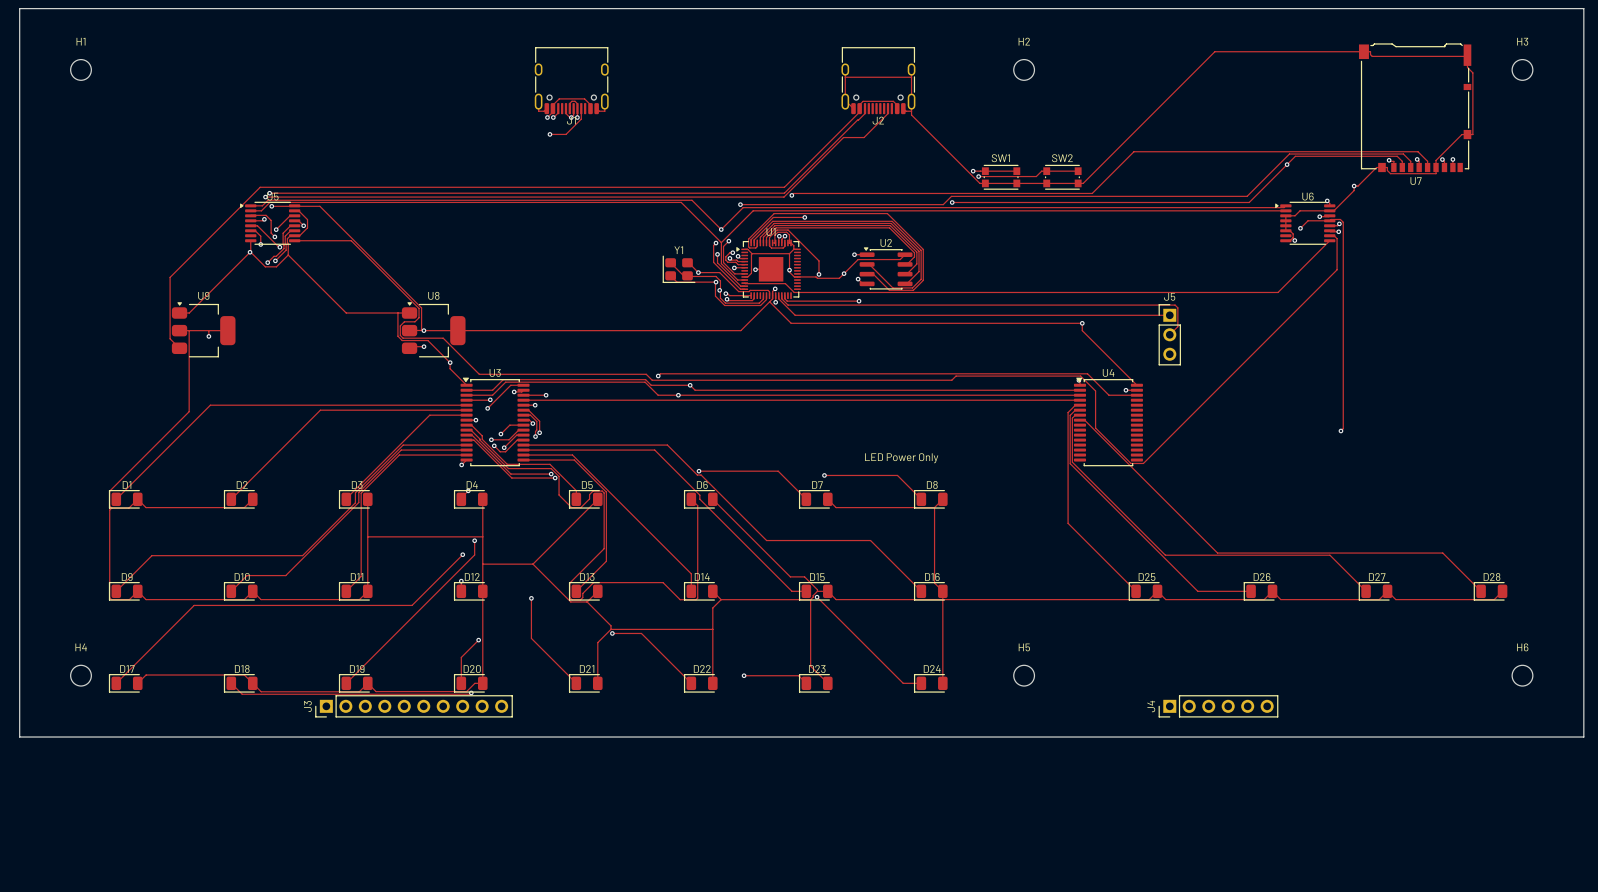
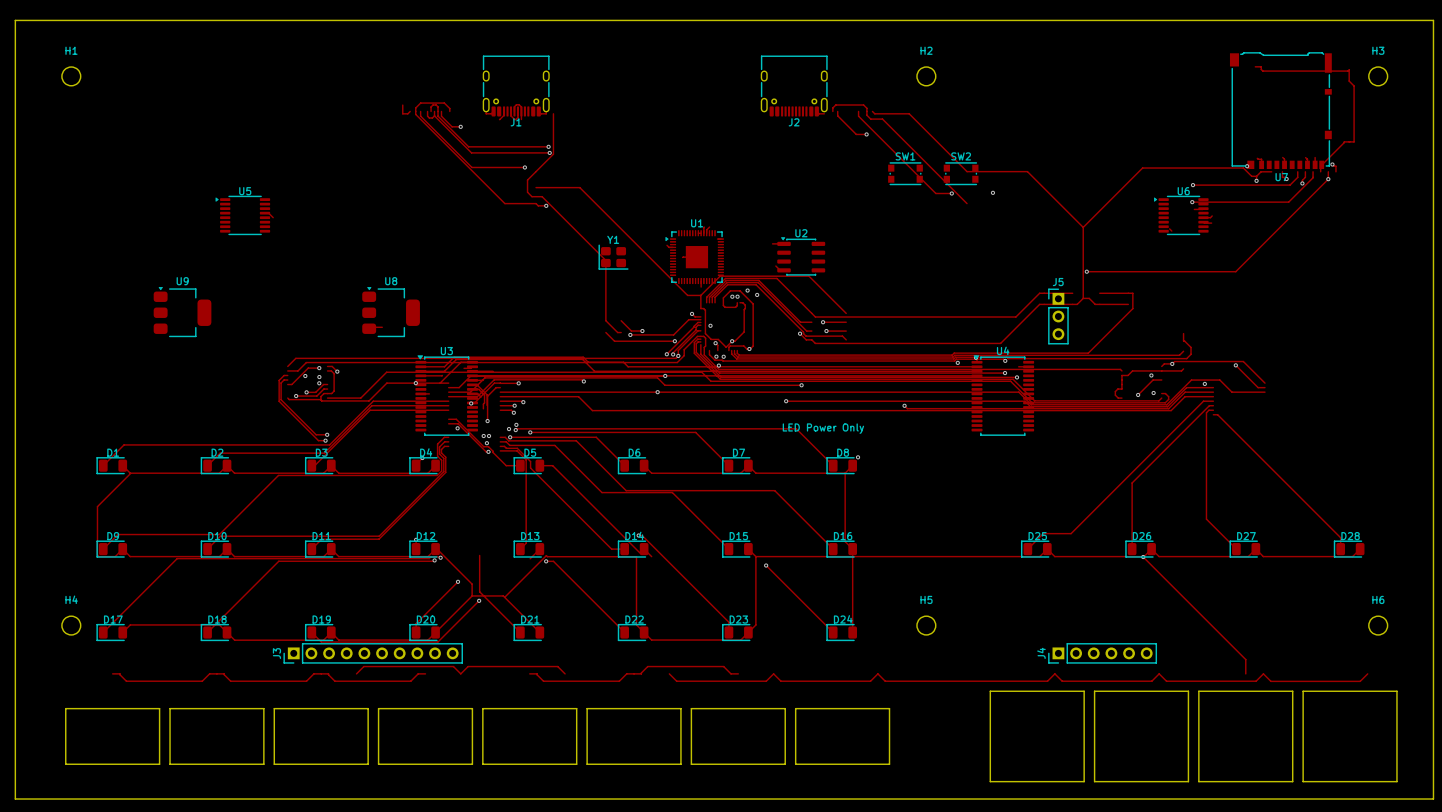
board edge: (19, 8) (1583, 8) (1583, 737) (19, 737) (19, 8) -> (15, 20) (15, 799) (1433, 799) (1433, 20) (15, 20)
track: none -> (1255, 66) (1261, 66) (1262, 71) (1349, 69) (1349, 81) (1354, 86) (1354, 141) (1344, 141) (1320, 166) (1320, 171)
track: (845, 69) (845, 104) (849, 104) (853, 108) -> none
track: (911, 69) (911, 115) (979, 183) (1083, 183) (1214, 51) (1370, 51) (1372, 56) (1467, 55) (1467, 67) (1472, 72) (1472, 134) (1461, 134) (1436, 160) (1436, 173) (1390, 173) (1387, 167) (1376, 167) (1358, 186) (1354, 186) (1354, 190) (1333, 210) (1300, 210) (1295, 215) (1285, 215) (1285, 230) (1289, 230) (1293, 234) (1293, 237) (1289, 240) (1285, 240) -> none
track: (845, 77) (911, 77) -> none
track: none -> (402, 105) (402, 113) (407, 113) (410, 111)
track: none -> (420, 111) (420, 116) (471, 167) (524, 167)
track: none -> (427, 111) (429, 117) (434, 115)
track: none -> (431, 111) (431, 106) (436, 104) (438, 106) (438, 116) (468, 146) (548, 146)
track: none -> (434, 111) (434, 115)
track: none -> (441, 111) (441, 116) (452, 126) (460, 126)
track: none -> (449, 111) (449, 108) (444, 103) (420, 103) (415, 107) (415, 114) (504, 203) (536, 203) (538, 205) (546, 205)
track: (581, 108) (581, 119) (565, 134) (549, 134) -> none
track: (590, 108) (590, 104) (584, 98) (559, 98) (552, 105) (552, 112) (547, 117) -> none
track: (865, 108) (865, 113) (784, 193) (269, 193) -> none
track: (888, 108) (888, 113) (864, 137) (843, 137) (784, 197) (265, 197) -> none
track: (897, 108) (897, 105) (893, 101) (863, 101) (859, 104) (859, 112) (784, 187) (260, 187) (170, 277) (170, 338) (179, 348) -> none
track: none -> (832, 111) (835, 105) (863, 105) (866, 108) (866, 115) (870, 119) (882, 119) (967, 203)
track: none -> (837, 111) (837, 115) (856, 134) (866, 134)
track: none -> (858, 111) (858, 116) (935, 193) (951, 193)
track: none -> (872, 111) (874, 113) (909, 113) (967, 171) (1027, 171) (1083, 227)
track: none -> (553, 113) (553, 154) (527, 180) (527, 192) (531, 196) (542, 196) (605, 260) (605, 320) (617, 332) (621, 332)
track: none -> (434, 115) (471, 152) (549, 152)
via: (547, 117) -> none
via: (553, 117) -> none
via: (571, 117) -> none
via: (577, 117) -> none
via: none -> (460, 126)
via: none -> (866, 134)
via: (549, 134) -> none
via: none -> (548, 146)
via: none -> (549, 152)
via: (1417, 159) -> none
via: (1442, 159) -> none
via: (1452, 159) -> none
via: (1389, 160) -> none
via: (1287, 164) -> none
track: (1402, 167) (1402, 161) (1397, 156) (1295, 156) (1249, 202) (952, 202) -> none
track: (1410, 167) (1410, 161) (1403, 154) (1289, 154) (1247, 196) (951, 196) (943, 204) (740, 204) -> none
track: (1427, 167) (1427, 161) (1417, 151) (1133, 151) (1092, 193) (793, 193) (791, 195) -> none
track: none -> (1332, 164) (1335, 166) (1335, 171)
via: none -> (1332, 164)
via: none -> (1247, 166)
via: none -> (524, 167)
track: (973, 171) (1016, 171) -> none
via: (973, 171) -> none
track: (1078, 171) (1041, 171) (1036, 176) (978, 176) -> none
track: none -> (1271, 171) (1261, 171) (1256, 176)
track: none -> (1282, 171) (1282, 177) (1286, 179)
track: none -> (1297, 171) (1297, 177) (1290, 185) (1192, 185)
track: none -> (1305, 171) (1302, 183)
track: none -> (1313, 171) (1313, 177) (1288, 202) (1192, 202)
track: none -> (1328, 171) (1328, 179) (1235, 271) (1086, 271)
via: (978, 176) -> none
track: none -> (1256, 176) (1251, 176) (1243, 168) (1142, 168) (1083, 227)
track: none -> (1256, 176) (1256, 180)
via: none -> (1286, 179)
via: none -> (1328, 179)
via: none -> (1256, 180)
via: (1354, 186) -> none
via: none -> (1302, 183)
via: none -> (1192, 185)
track: none -> (536, 187) (579, 187) (687, 295) (700, 295)
via: (269, 193) -> none
via: (791, 195) -> none
via: (265, 197) -> none
via: none -> (992, 192)
via: none -> (951, 193)
track: (1327, 200) (1329, 205) -> none
via: (1327, 200) -> none
via: (952, 202) -> none
via: (740, 204) -> none
track: (250, 205) (262, 205) (267, 200) (691, 200) (721, 229) (743, 207) (1284, 207) (1285, 205) -> none
track: (271, 206) (319, 206) (421, 307) (421, 330) -> none
via: (271, 206) -> none
via: none -> (1192, 202)
track: (250, 210) (261, 210) (269, 202) (681, 202) (721, 242) -> none
track: (294, 210) (298, 210) (307, 219) (307, 227) (299, 235) (290, 235) (287, 238) (288, 255) -> none
track: (1285, 210) (753, 210) (721, 242) -> none
via: none -> (546, 205)
track: (250, 215) (266, 215) (271, 220) (271, 233) (274, 236) -> none
track: (294, 215) (290, 215) (276, 229) -> none
via: (1319, 216) -> none
track: (804, 217) (773, 217) (751, 239) (751, 242) -> none
via: (804, 217) -> none
track: (264, 219) (250, 220) -> none
via: (264, 219) -> none
via: (1339, 223) -> none
track: (250, 225) (257, 225) (279, 247) -> none
track: (294, 225) (290, 225) (283, 233) (283, 248) (267, 262) -> none
via: (303, 225) -> none
track: (1300, 228) (1308, 220) (1340, 219) (1343, 222) (1343, 428) (1340, 430) -> none
via: (1300, 228) -> none
via: (276, 229) -> none
via: (721, 229) -> none
track: (250, 230) (255, 230) (260, 236) (260, 244) -> none
track: (294, 230) (290, 230) (285, 236) (286, 250) (275, 260) -> none
via: (1338, 231) -> none
track: (1329, 235) (1334, 235) (1337, 238) (1337, 269) (1143, 463) (1131, 463) (1095, 428) (1095, 390) (1080, 376) (956, 376) (951, 380) (652, 380) (646, 374) (479, 374) (443, 338) (403, 338) (400, 335) (400, 325) (404, 321) (414, 321) (419, 317) (419, 308) (351, 240) (294, 240) -> none
via: (274, 236) -> none
via: (779, 236) -> none
via: (784, 236) -> none
track: none -> (1083, 227) (1083, 298)
track: (250, 240) (250, 252) -> none
via: (1294, 240) -> none
track: (1329, 240) (1278, 292) (794, 292) (785, 283) (744, 283) -> none
track: (728, 241) (723, 246) (723, 262) (734, 273) (744, 273) -> none
via: (728, 241) -> none
track: (721, 242) (721, 263) (737, 280) (744, 280) -> none
track: (754, 242) (754, 239) (772, 221) (892, 221) (921, 250) (921, 279) (912, 287) (892, 287) (869, 264) (867, 264) -> none
track: (757, 242) (755, 247) (748, 246) (748, 239) (774, 213) (887, 213) (923, 249) (923, 280) (913, 290) (889, 290) (873, 274) (867, 274) -> none
track: (760, 242) (760, 237) (774, 223) (891, 223) (919, 251) (919, 271) (905, 283) -> none
track: (763, 242) (763, 237) (775, 225) (890, 225) (916, 252) (916, 264) (905, 274) -> none
track: (766, 242) (766, 237) (776, 227) (889, 227) (914, 252) (914, 256) (905, 264) -> none
track: (774, 242) (774, 235) (777, 232) (786, 232) (789, 235) (789, 242) -> none
track: (784, 242) (783, 248) (771, 248) (769, 246) (769, 237) (777, 230) (788, 230) (818, 260) (818, 274) -> none
track: (787, 242) (793, 245) (793, 249) (789, 253) -> none
track: (716, 243) (713, 245) (713, 262) (740, 289) (744, 289) -> none
via: (716, 243) -> none
via: (260, 244) -> none
via: (279, 247) -> none
track: (744, 249) (747, 249) (752, 253) -> none
track: (250, 252) (265, 266) (276, 266) (288, 255) -> none
track: (250, 252) (189, 313) (179, 313) -> none
via: (250, 252) -> none
track: (732, 252) (725, 256) (725, 260) (727, 262) (744, 264) -> none
via: (732, 252) -> none
track: (752, 253) (789, 253) -> none
track: (752, 253) (751, 273) (744, 276) -> none
track: (789, 253) (789, 272) (794, 276) (817, 278) (839, 278) (858, 259) (900, 259) (905, 254) -> none
track: (717, 254) (717, 262) (740, 286) (744, 286) -> none
via: (717, 254) -> none
via: (854, 254) -> none
track: (288, 255) (346, 313) (409, 313) -> none
via: (738, 256) -> none
track: (729, 258) (744, 261) -> none
via: (729, 258) -> none
via: (275, 260) -> none
via: (267, 262) -> none
track: (670, 262) (683, 275) (715, 276) (720, 280) (720, 298) (725, 303) (759, 303) (763, 299) (763, 295) -> none
track: (687, 262) (698, 272) (719, 272) (738, 291) (768, 290) (769, 295) -> none
via: (734, 267) -> none
track: (744, 267) (734, 267) -> none
via: (755, 269) -> none
via: (789, 270) -> none
via: (698, 272) -> none
via: (844, 273) -> none
via: (818, 274) -> none
track: (670, 275) (676, 282) (716, 282) -> none
via: (858, 279) -> none
track: (715, 282) (715, 296) (724, 305) (760, 305) (766, 299) (766, 295) -> none
via: (716, 282) -> none
via: none -> (1086, 271)
track: (775, 288) (772, 291) (772, 298) (740, 330) (409, 330) -> none
via: (775, 288) -> none
via: (719, 290) -> none
track: (725, 293) (729, 295) (751, 295) -> none
via: (725, 293) -> none
track: (754, 295) (752, 300) (727, 299) -> none
track: (778, 295) (778, 298) (795, 315) (1169, 315) -> none
track: (781, 295) (781, 298) (788, 305) (1175, 305) (1177, 307) (1177, 326) (1169, 334) -> none
track: (784, 295) (787, 301) (859, 301) -> none
via: (727, 299) -> none
track: (769, 301) (791, 323) (1082, 323) (1082, 330) (1136, 385) -> none
via: (859, 301) -> none
via: (775, 302) -> none
via: none -> (747, 290)
track: none -> (1072, 293) (1039, 293) (1015, 317) (815, 317) (776, 278) (725, 278) (706, 297) (706, 302)
track: none -> (1099, 293) (1132, 293) (1132, 308) (1088, 353) (739, 355) (737, 350)
via: none -> (757, 294)
track: none -> (700, 295) (700, 308) (705, 310) (705, 333) (711, 339) (718, 339) (726, 347) (744, 331) (745, 305) (740, 302)
track: none -> (700, 295) (720, 276) (809, 276) (846, 313)
via: none -> (732, 296)
via: none -> (737, 296)
track: (397, 313) (397, 336) (402, 340) (427, 340) (450, 362) (450, 368) (466, 385) -> none
track: none -> (1083, 298) (1077, 304) (1039, 304) (1000, 343) (815, 343) (811, 339) (806, 339) (800, 333)
track: none -> (1083, 298) (1089, 298) (1095, 304) (1128, 304)
track: none -> (709, 302) (709, 297) (726, 280) (758, 280) (800, 322) (811, 322)
track: none -> (712, 302) (712, 297) (726, 282) (758, 282) (806, 331) (811, 331)
track: none -> (715, 302) (715, 297) (727, 284) (756, 284) (806, 336) (842, 336) (846, 339)
track: none -> (737, 302) (735, 307) (725, 307) (723, 297) (730, 290) (740, 290) (753, 303) (753, 346) (746, 348) (743, 346) (730, 346) (728, 350)
via: (1082, 323) -> none
track: (179, 330) (227, 330) -> none
track: (189, 330) (189, 411) (109, 491) (109, 506) (111, 508) -> none
track: (208, 330) (208, 336) -> none
via: (423, 330) -> none
track: none -> (692, 313) (695, 316) (700, 316)
via: none -> (692, 313)
via: (208, 336) -> none
track: none -> (700, 319) (688, 319) (673, 334) (630, 334)
track: none -> (621, 320) (631, 331) (642, 331)
track: none -> (700, 322) (697, 322) (666, 354)
track: none -> (823, 322) (846, 322)
via: none -> (823, 322)
track: none -> (700, 325) (696, 327) (696, 329) (673, 354)
via: none -> (710, 325)
via: (424, 346) -> none
via: none -> (642, 331)
track: none -> (700, 330) (697, 330) (678, 350) (678, 355) (675, 358) (295, 358) (287, 366)
track: none -> (826, 331) (846, 331)
via: none -> (826, 331)
track: none -> (605, 332) (614, 341) (674, 341)
via: none -> (800, 333)
track: none -> (1183, 333) (1183, 340) (1191, 347) (1191, 354) (1186, 358) (955, 357) (953, 358) (736, 358) (731, 353) (731, 350)
via: none -> (630, 334)
track: none -> (700, 339) (694, 342) (694, 353) (720, 379) (1013, 379) (1034, 400) (1158, 400) (1161, 398)
via: (450, 362) -> none
via: none -> (674, 341)
track: none -> (700, 341) (696, 343) (696, 352) (721, 377) (1017, 377)
via: none -> (732, 341)
track: none -> (715, 343) (717, 350)
via: none -> (715, 343)
track: none -> (700, 344) (700, 354) (719, 373) (1005, 373)
via: none -> (749, 348)
track: none -> (709, 350) (709, 354) (714, 360) (723, 361) (954, 361) (956, 359) (1003, 359) (1005, 360)
track: none -> (734, 350) (737, 357) (1179, 355) (1183, 351)
track: (658, 376) (660, 373) (1087, 373) (1108, 395) (1136, 395) -> none
via: (658, 376) -> none
via: none -> (666, 354)
via: none -> (673, 354)
via: none -> (678, 355)
via: none -> (716, 356)
via: none -> (723, 356)
via: none -> (1005, 360)
via: (690, 385) -> none
via: none -> (957, 362)
via: none -> (1172, 363)
via: none -> (718, 365)
track: none -> (1235, 365) (1258, 387) (1264, 387)
via: none -> (1235, 365)
track: none -> (327, 366) (332, 366) (337, 371)
track: none -> (1161, 366) (1174, 361) (1243, 361) (1264, 383)
via: (1125, 390) -> none
track: none -> (319, 368) (308, 368) (291, 384) (287, 384)
via: none -> (319, 368)
via: (514, 391) -> none
track: none -> (1183, 368) (1181, 370) (1132, 370) (1128, 375) (1121, 375) (1121, 389) (1115, 391) (1118, 398) (1121, 398)
track: none -> (287, 370) (297, 370) (306, 362) (677, 362) (684, 355) (684, 349) (697, 336) (705, 338) (704, 354) (718, 369) (1120, 369) (1121, 370)
track: none -> (327, 370) (334, 373) (334, 391) (331, 393) (323, 393) (320, 396) (321, 400) (369, 400) (386, 383) (448, 383)
via: none -> (337, 371)
via: (546, 395) -> none
via: (678, 395) -> none
via: none -> (1005, 373)
track: none -> (287, 375) (284, 375) (279, 380) (279, 401) (318, 440) (325, 440)
via: (490, 399) -> none
via: none -> (1151, 375)
via: none -> (305, 376)
track: none -> (665, 375) (470, 375) (459, 387) (448, 387)
via: none -> (665, 375)
via: none -> (319, 377)
via: none -> (1017, 377)
track: none -> (287, 380) (284, 380) (281, 382) (281, 399) (316, 434) (327, 434)
track: none -> (1161, 380) (1153, 380) (1138, 394)
track: (466, 405) (210, 405) (139, 476) -> (448, 401) (373, 401) (329, 444) (124, 444)
via: (535, 405) -> none
track: (1079, 405) (1075, 405) (1068, 412) (1068, 523) (1136, 591) -> (1213, 401) (1203, 401) (1071, 533) (1043, 533) (1027, 549)
track: none -> (583, 381) (582, 379) (494, 379) (477, 396) (448, 396)
via: none -> (583, 381)
via: none -> (319, 383)
via: none -> (415, 383)
via: (487, 408) -> none
track: none -> (518, 383) (494, 383) (474, 403) (471, 403)
via: none -> (518, 383)
track: none -> (327, 384) (323, 384) (315, 392) (306, 392)
track: (466, 410) (320, 410) (245, 485) -> (448, 405) (371, 405) (324, 453) (220, 453)
track: none -> (801, 385) (664, 385) (657, 377) (484, 377) (470, 392) (448, 392)
via: none -> (801, 385)
track: (1079, 410) (1075, 410) (1070, 415) (1070, 463) (1197, 591) (1251, 591) -> (1213, 405) (1209, 405) (1132, 482) (1132, 549)
track: none -> (500, 387) (496, 387) (487, 396) (487, 421)
track: none -> (1213, 387) (1186, 387) (1167, 406) (1030, 406) (1025, 401) (786, 401)
track: none -> (327, 389) (323, 389) (316, 396) (296, 396)
track: (466, 415) (429, 415) (346, 499) -> (448, 410) (370, 410) (314, 465) (311, 465)
track: (1079, 415) (1075, 415) (1072, 418) (1072, 462) (1165, 555) (1329, 555) (1333, 558) -> (1213, 410) (1206, 412) (1206, 519)
via: none -> (306, 392)
track: none -> (500, 392) (1018, 392) (1031, 404) (1166, 404) (1191, 380) (1219, 380) (1231, 392) (1264, 392)
via: none -> (657, 392)
track: none -> (1213, 392) (1185, 392) (1168, 408) (907, 408) (904, 405)
via: none -> (1153, 393)
track: none -> (1161, 393) (1165, 393) (1168, 396) (1165, 402) (1032, 402) (1010, 381) (710, 381) (701, 372) (386, 372) (360, 398) (327, 398)
via: (475, 420) -> none
track: (1079, 420) (1084, 420) (1217, 553) (1442, 553) (1481, 591) -> (1213, 414) (1217, 414) (1340, 537) (1340, 549)
via: none -> (1138, 394)
via: none -> (296, 396)
via: (532, 423) -> none
track: none -> (500, 396) (578, 396) (592, 410) (1171, 410) (1185, 396) (1213, 396)
track: none -> (287, 398) (320, 399)
track: (466, 425) (471, 425) (482, 435) (482, 439) (507, 464) (549, 464) (576, 490) (576, 499) -> (448, 419) (456, 419) (483, 446) (488, 446) (506, 465) (520, 465)
track: (523, 425) (509, 425) (500, 434) -> none
track: none -> (500, 401) (523, 402)
via: none -> (786, 401)
via: none -> (523, 402)
track: (466, 430) (471, 430) (508, 468) (551, 468) (559, 476) (559, 495) (571, 507) (580, 507) (589, 498) (589, 494) (593, 491) (602, 491) (604, 492) (604, 548) (569, 583) (569, 597) (572, 599) (580, 599) (582, 593) (593, 582) (663, 582) (680, 599) -> (504, 597) (546, 555) (614, 556)
via: none -> (471, 403)
track: (523, 430) (518, 430) (509, 439) (491, 439) -> none
via position: (1340, 430) -> (1204, 383)
via: (539, 432) -> none
track: none -> (500, 405) (514, 405)
via: none -> (514, 405)
via: none -> (904, 405)
via: (500, 434) -> none
track: (466, 435) (471, 435) (510, 474) (551, 474) -> none
track: (523, 435) (516, 435) (504, 447) -> none
via: (535, 436) -> none
track: none -> (500, 410) (511, 410) (513, 412)
via: (491, 439) -> none
track: (466, 440) (473, 440) (511, 478) (554, 478) -> none
track: (523, 440) (517, 440) (505, 451) (500, 451) (494, 445) -> none
via: none -> (513, 412)
track: (466, 445) (403, 445) (355, 492) (355, 502) (302, 555) (151, 555) (132, 575) -> (448, 437) (444, 437) (437, 444) (437, 456) (441, 460) (441, 471) (437, 475) (278, 475) (219, 534) (117, 534)
via: (494, 445) -> none
track: (523, 445) (667, 445) (697, 475) (701, 475) (766, 540) (870, 540) -> (500, 437) (505, 437) (508, 440) (576, 440) (626, 490) (774, 490) (787, 503)
via: (504, 447) -> none
track: (466, 450) (401, 450) (358, 492) (358, 502) (285, 575) (245, 577) -> (448, 441) (444, 441) (439, 447) (439, 454) (443, 458) (443, 471) (379, 536) (220, 536)
track: (523, 450) (654, 450) (699, 495) (699, 499) (791, 591) (806, 591) -> (500, 441) (506, 441) (509, 445) (554, 445) (601, 492) (672, 492) (728, 549)
via: none -> (487, 421)
track: none -> (448, 423) (458, 423) (486, 451) (488, 451)
via: none -> (516, 424)
track: (466, 455) (399, 455) (361, 493) (361, 576) (357, 580) -> (448, 446) (444, 446) (441, 449) (441, 452) (445, 457) (445, 472) (378, 539) (321, 539)
track: (523, 455) (572, 455) (691, 573) (691, 591) -> (501, 446) (517, 448) (530, 461) (530, 468) (611, 549) (624, 549)
via: none -> (457, 428)
via: none -> (509, 429)
track: (466, 460) (461, 464) -> none
track: (523, 460) (574, 460) (606, 492) (606, 561) (582, 584) -> (500, 450) (517, 450) (526, 459) (526, 543)
via: none -> (515, 430)
via: none -> (530, 432)
via: (461, 464) -> none
via: none -> (327, 434)
via: none -> (483, 436)
via: none -> (489, 436)
track: none -> (510, 437) (596, 437) (624, 465)
via: none -> (510, 437)
via: none -> (325, 440)
track: (698, 471) (778, 471) -> (530, 432) (695, 432) (703, 440)
via: (698, 471) -> none
via: none -> (486, 443)
via: (551, 474) -> none
track: (824, 475) (897, 475) -> (515, 430) (796, 428) (811, 444)
via: (824, 475) -> none
via: (555, 478) -> none
via: none -> (488, 451)
via: none -> (858, 457)
track: (137, 499) (129, 508) (111, 508) -> none
track: none -> (227, 465) (234, 473) (323, 473) (331, 465) (338, 473) (427, 473) (435, 465)
track: (367, 499) (367, 591) -> (472, 595) (472, 584) (437, 549) (428, 556) (338, 556) (331, 549)
track: (482, 499) (482, 683) (474, 683) (466, 691) (376, 691) -> (472, 595) (428, 640) (338, 640)
track: (597, 499) (532, 564) -> (539, 465) (552, 465) (640, 553)
track: (691, 499) (697, 505) (697, 598) (696, 599) -> (755, 556) (755, 625) (740, 640) (651, 640) (636, 624) (636, 556) (628, 556)
track: (721, 507) (790, 576) (804, 576) (817, 591) -> (651, 473) (740, 473) (748, 465)
track: (111, 508) (109, 510) (109, 597) (111, 599) (129, 599) -> (130, 473) (97, 506) (97, 555) (115, 556)
track: (367, 536) (482, 536) -> none
track: (474, 540) (474, 554) (346, 683) -> (479, 600) (437, 642) (321, 642) (311, 632)
via: (474, 540) -> none
track: (462, 554) (412, 605) (194, 605) -> (440, 557) (177, 558) (173, 561)
via: (462, 554) -> none
track: (482, 564) (532, 564) -> none
track: (532, 564) (570, 601) (587, 601) (610, 625) (610, 629) -> none
via: none -> (638, 535)
track: (817, 591) (827, 591) -> none
track: (817, 591) (810, 599) -> none
track: (817, 597) (903, 683) (921, 683) -> (766, 565) (833, 632)
via position: (817, 597) -> (766, 565)
via: (531, 598) -> none
track: (810, 599) (810, 666) (827, 683) -> none
track: (810, 599) (721, 599) (712, 608) (712, 683) -> none
via: none -> (440, 557)
track: none -> (1143, 557) (1245, 659) (1245, 673)
via: none -> (1143, 557)
via: none -> (434, 560)
via: none -> (458, 581)
track: (610, 629) (597, 642) (597, 683) -> (504, 597) (539, 632)
track: (610, 629) (712, 629) -> none
track: (612, 633) (641, 633) -> (546, 561) (553, 561) (579, 587)
via position: (612, 633) -> (546, 561)
track: (478, 640) (461, 657) (461, 673) -> (458, 581) (416, 623)
via: (478, 640) -> none
track: none -> (472, 595) (504, 597)
via: none -> (479, 600)
track: (744, 675) (798, 675) (806, 683) -> (638, 535) (642, 535) (728, 622) (728, 632)
via: (744, 675) -> none
track: (231, 683) (242, 694) (471, 692) -> (207, 632) (278, 561) (434, 560)
via: (471, 692) -> none
track: none -> (112, 673) (119, 673) (126, 681) (202, 681) (209, 673) (224, 673) (230, 681) (306, 681) (313, 673) (328, 673) (334, 681) (410, 681) (418, 673) (425, 673)
track: none -> (356, 673) (363, 666) (453, 666) (460, 673) (468, 666) (557, 666) (565, 673)
track: none -> (529, 673) (537, 673) (543, 681) (619, 681) (626, 673) (641, 673) (647, 666) (723, 666) (730, 673) (738, 673)
track: none -> (669, 673) (676, 681) (766, 681) (773, 673) (780, 681) (870, 681) (877, 673) (885, 681) (1047, 681) (1054, 673) (1062, 681) (1151, 681) (1159, 673) (1166, 681) (1256, 681) (1263, 673) (1270, 681) (1360, 681) (1367, 673)
board edge: none -> (990, 691) (1084, 691) (1084, 781) (990, 781) (990, 691)
board edge: none -> (1094, 691) (1188, 691) (1188, 781) (1094, 781) (1094, 691)
board edge: none -> (1198, 691) (1292, 691) (1292, 781) (1198, 781) (1198, 691)
board edge: none -> (1303, 691) (1396, 691) (1396, 781) (1303, 781) (1303, 691)
board edge: none -> (65, 708) (159, 708) (159, 764) (65, 764) (65, 708)
board edge: none -> (170, 708) (263, 708) (263, 764) (170, 764) (170, 708)
board edge: none -> (274, 708) (368, 708) (368, 764) (274, 764) (274, 708)
board edge: none -> (378, 708) (472, 708) (472, 764) (378, 764) (378, 708)
board edge: none -> (482, 708) (576, 708) (576, 764) (482, 764) (482, 708)
board edge: none -> (587, 708) (680, 708) (680, 764) (587, 764) (587, 708)
board edge: none -> (691, 708) (785, 708) (785, 764) (691, 764) (691, 708)
board edge: none -> (795, 708) (889, 708) (889, 764) (795, 764) (795, 708)

